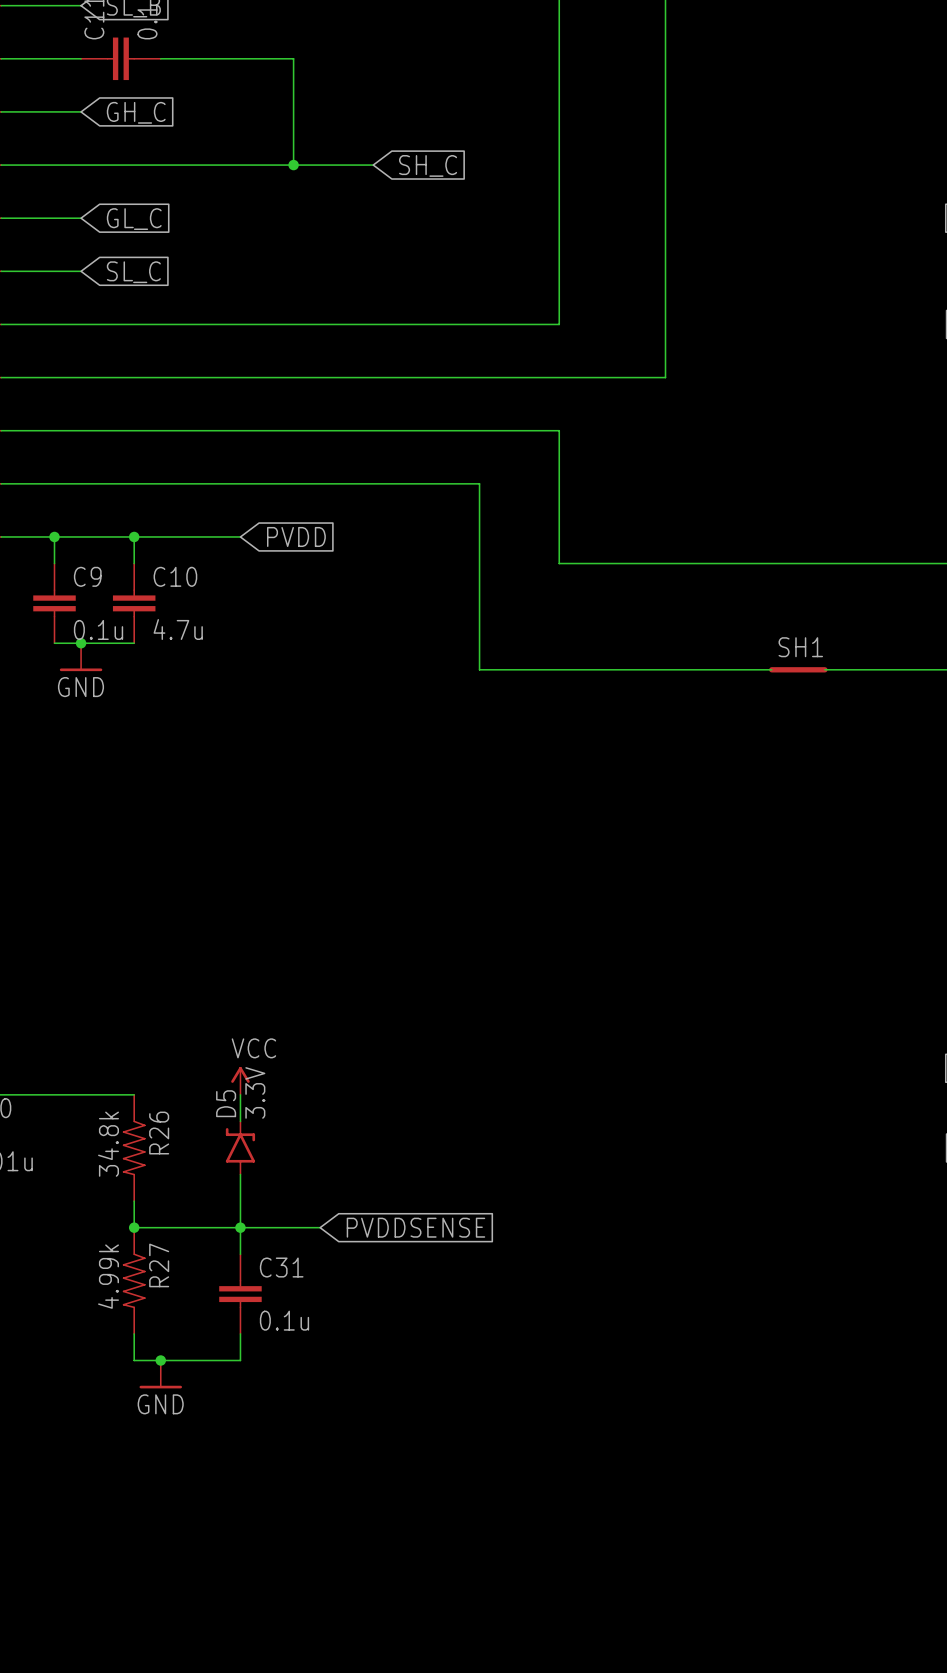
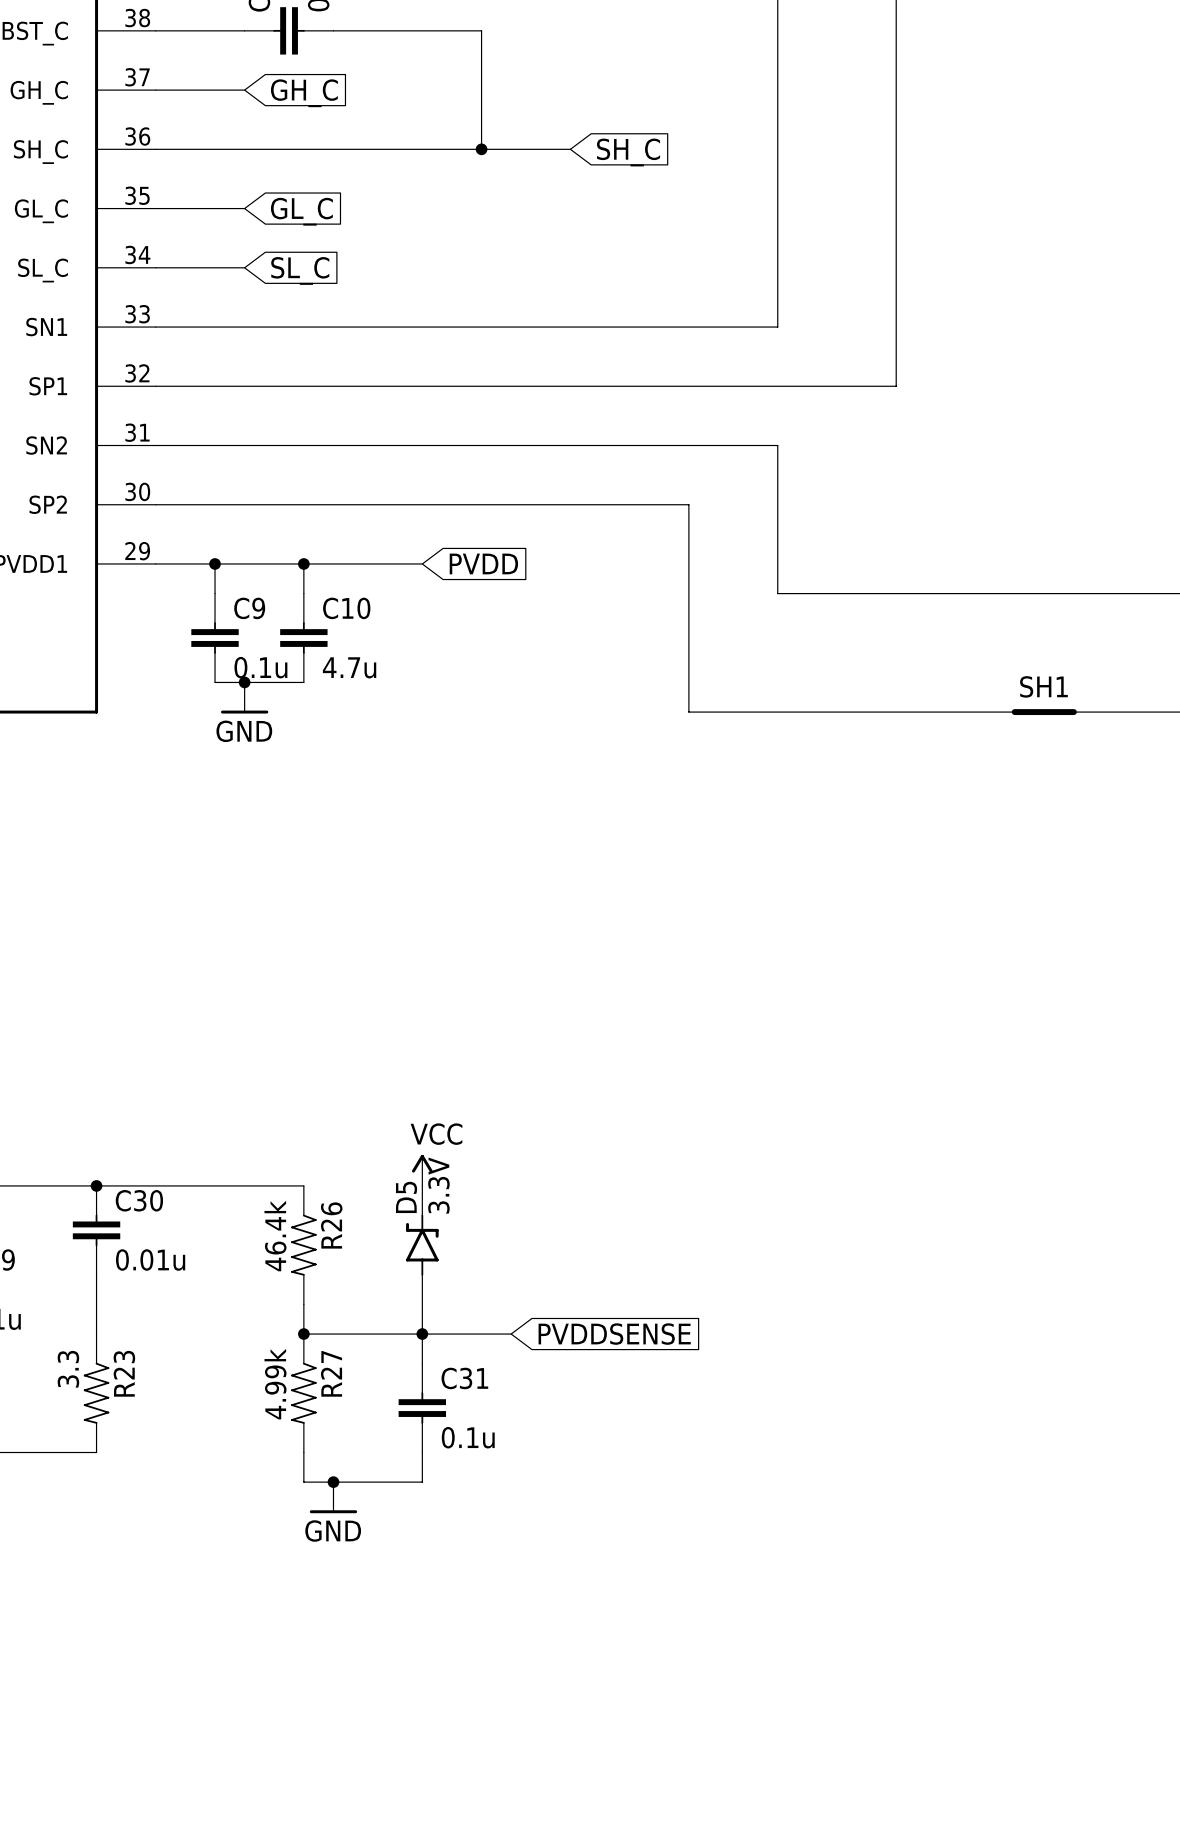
R26 value: 34.8k (108, 1144) -> 46.4k (275, 1236)

